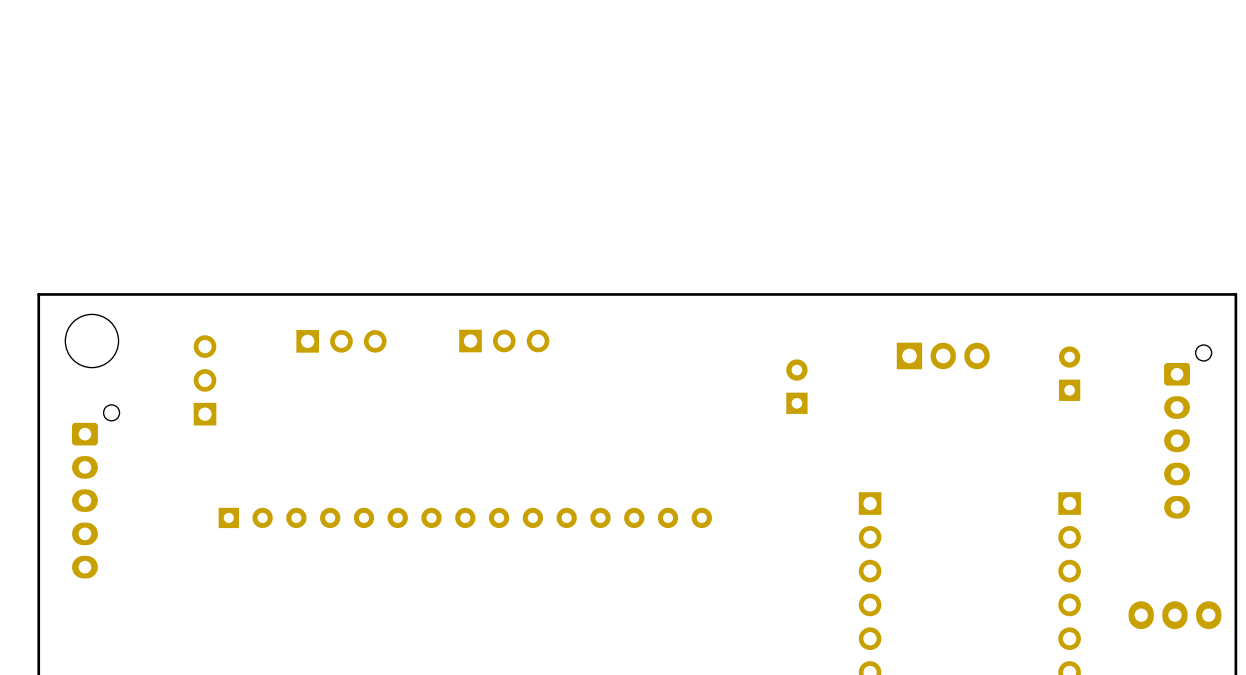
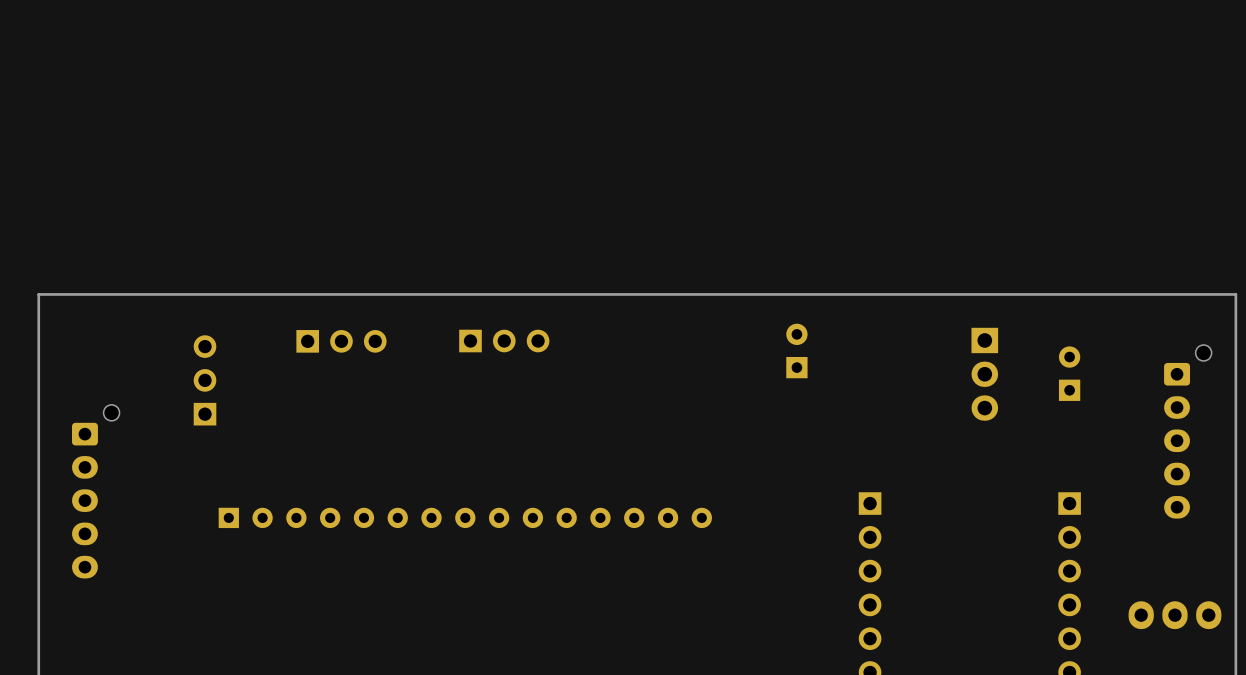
round board edge: [65, 314, 119, 368] -> none
part rotation: 0° (943, 355) -> 90° clockwise (984, 374)
part position: (796, 386) -> (796, 350)

